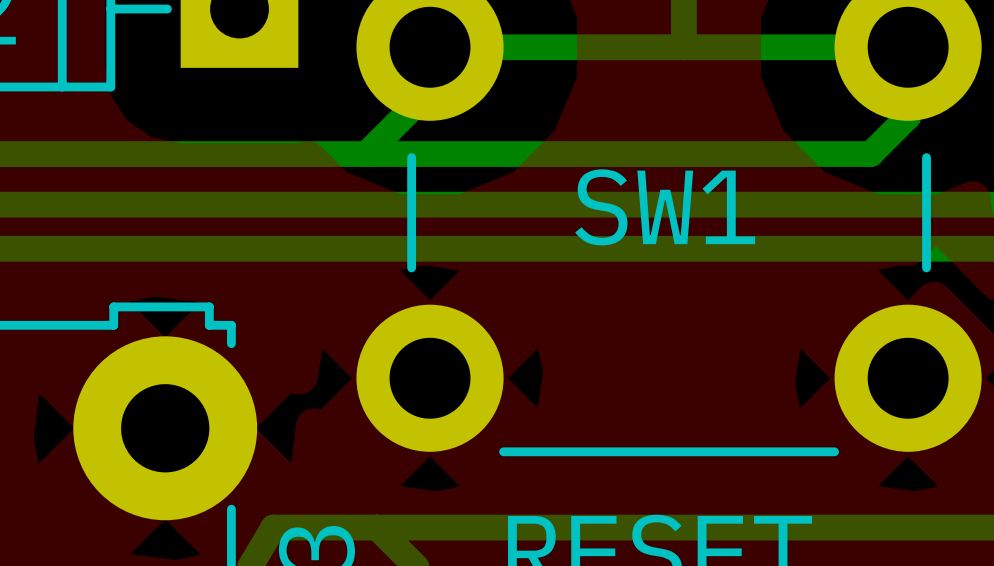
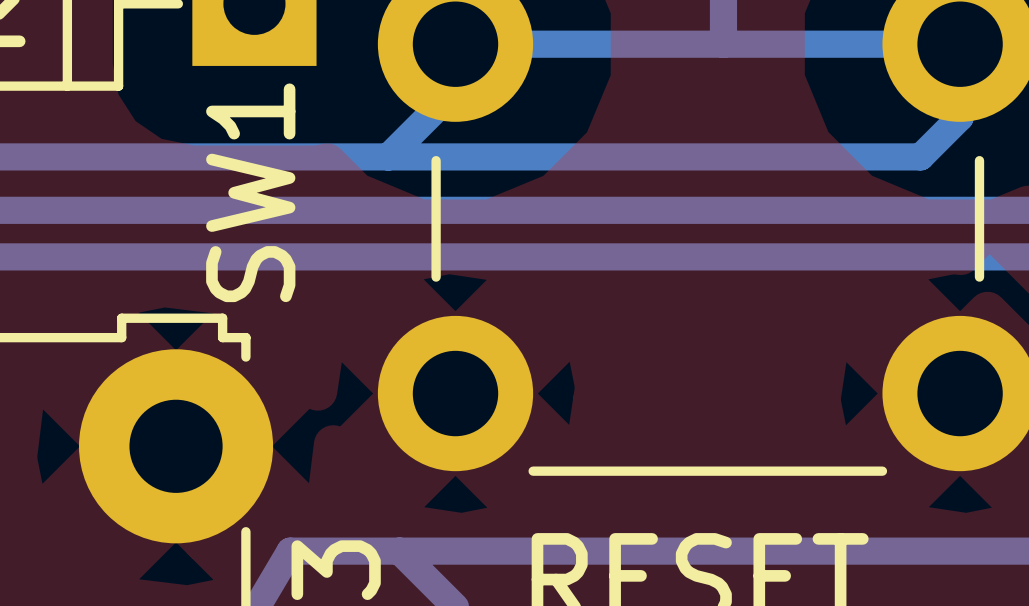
SW1 name rotation: 0° (665, 207) -> 90° counterclockwise (250, 192)
SW1 name position: SW1 (665, 207) -> SW1 (250, 192)

